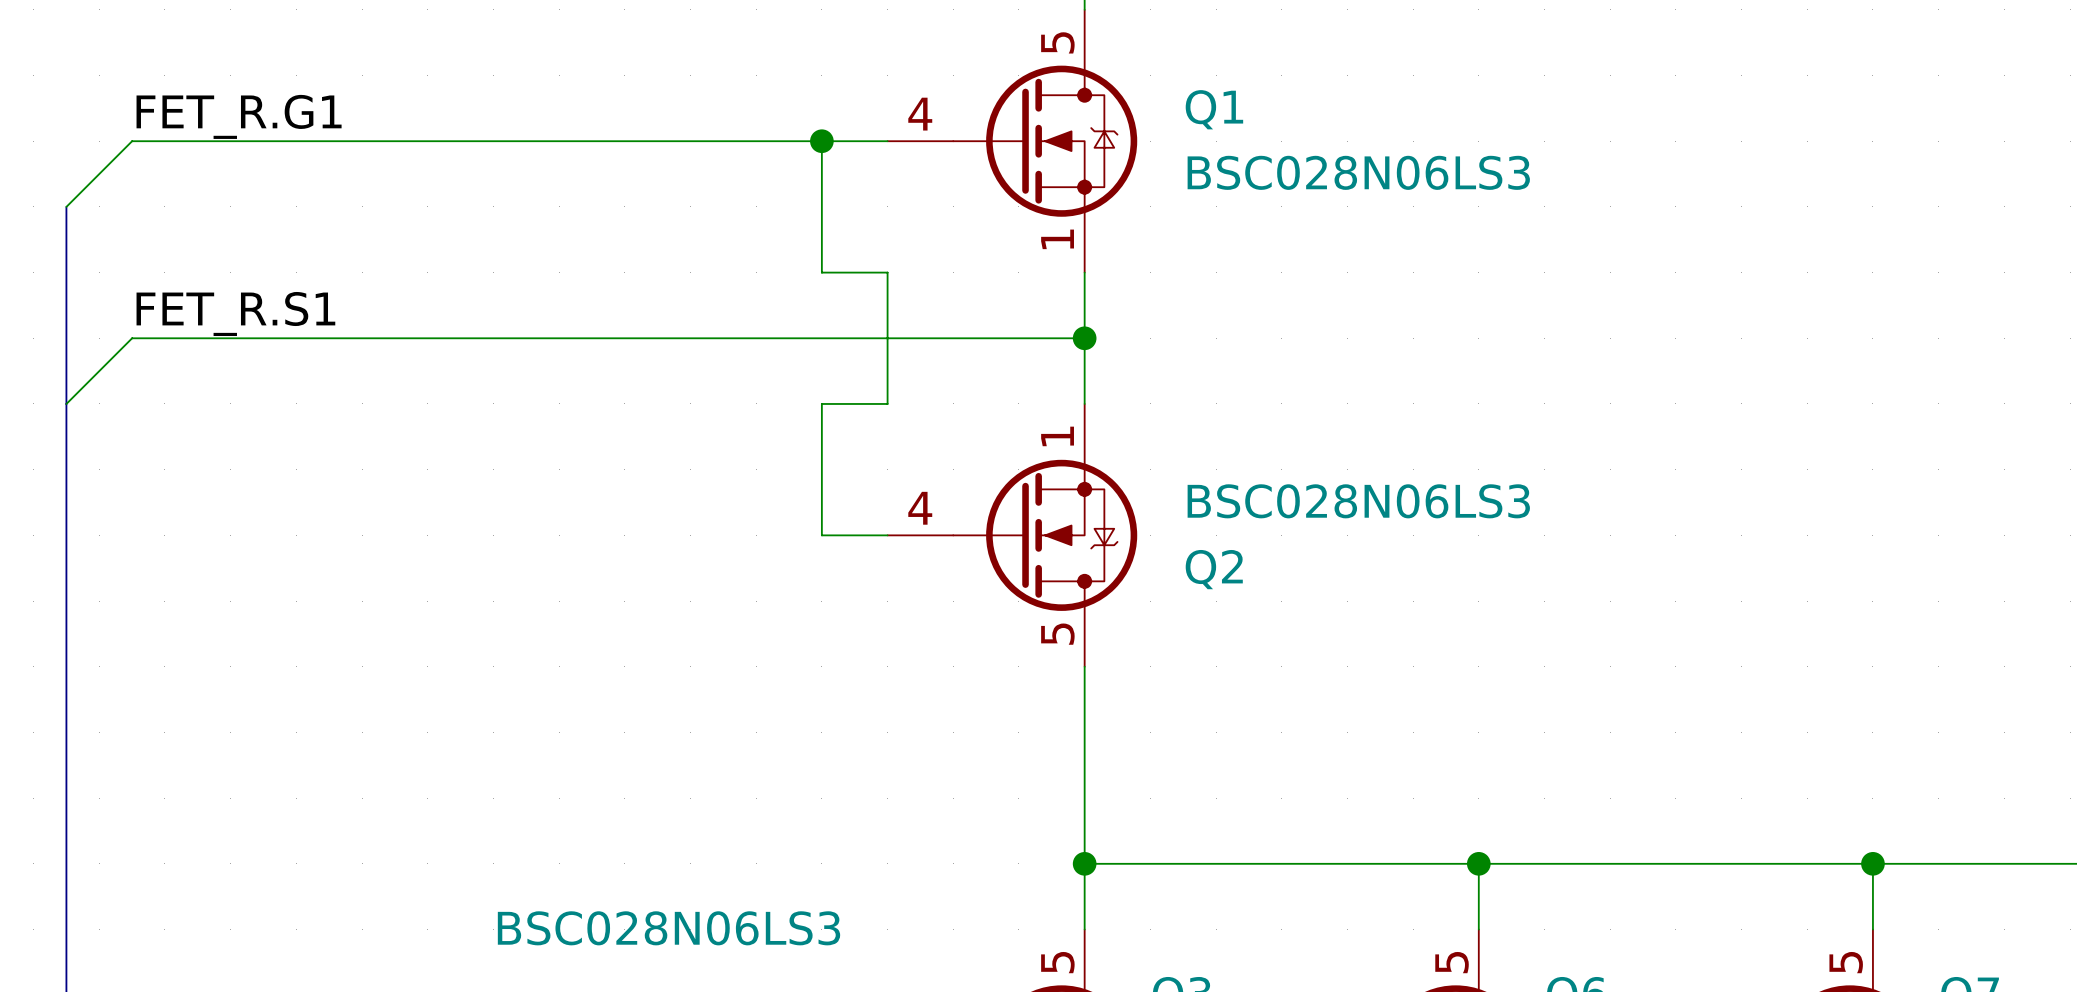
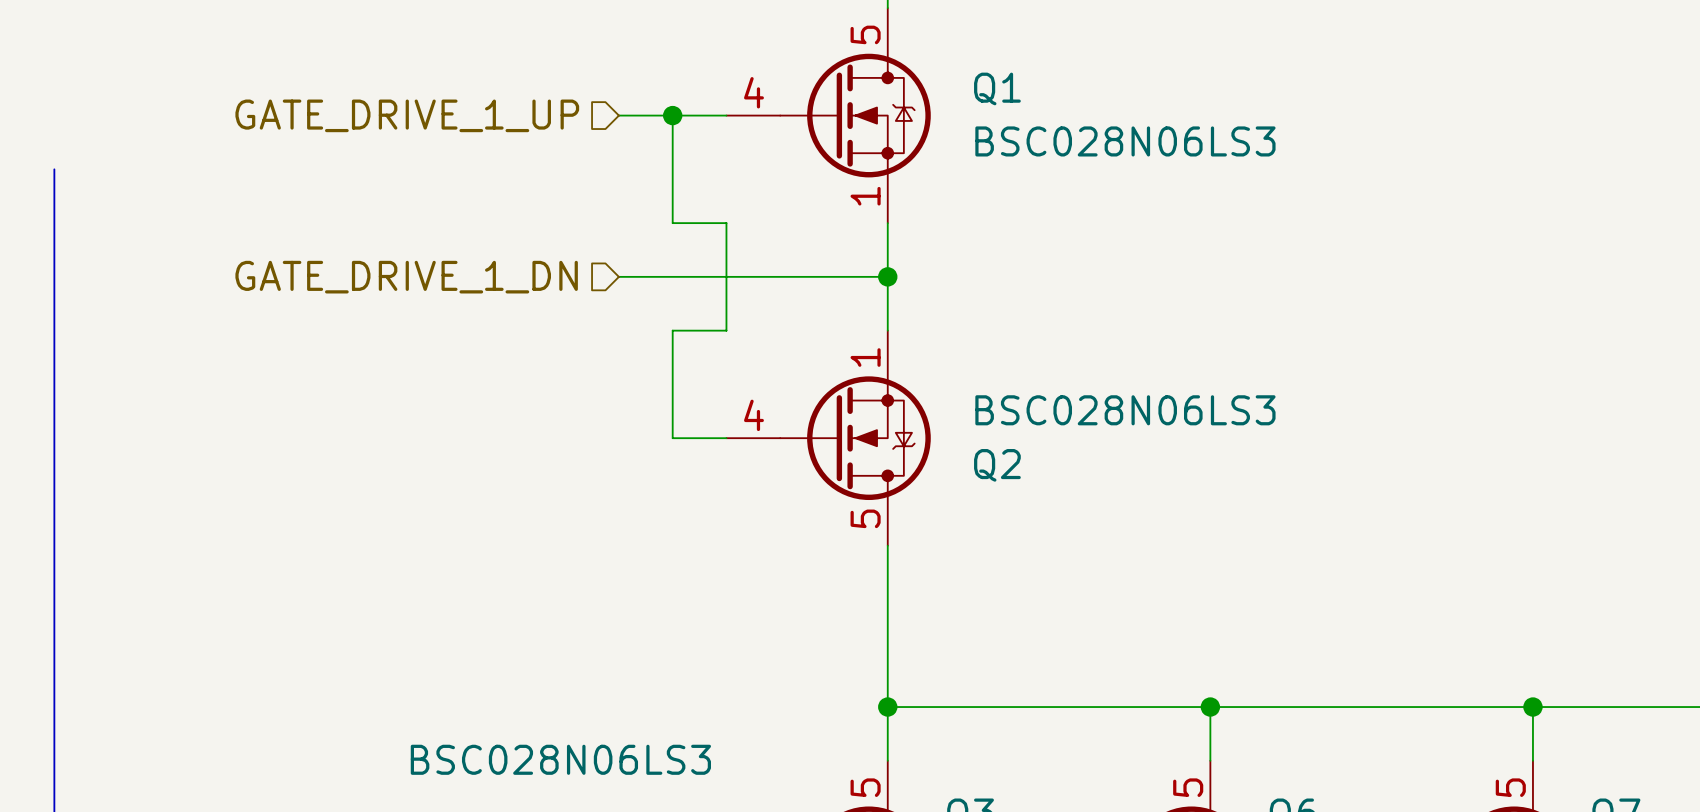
label: FET_R.G1 (239, 116) -> none
wire: (756, 141) (132, 141) (66, 206) -> none
hierarchical label: none -> GATE_DRIVE_1_UP (407, 115)
label: FET_R.S1 (235, 313) -> none
wire: (756, 338) (132, 338) (66, 403) -> none
hierarchical label: none -> GATE_DRIVE_1_DN (406, 277)

